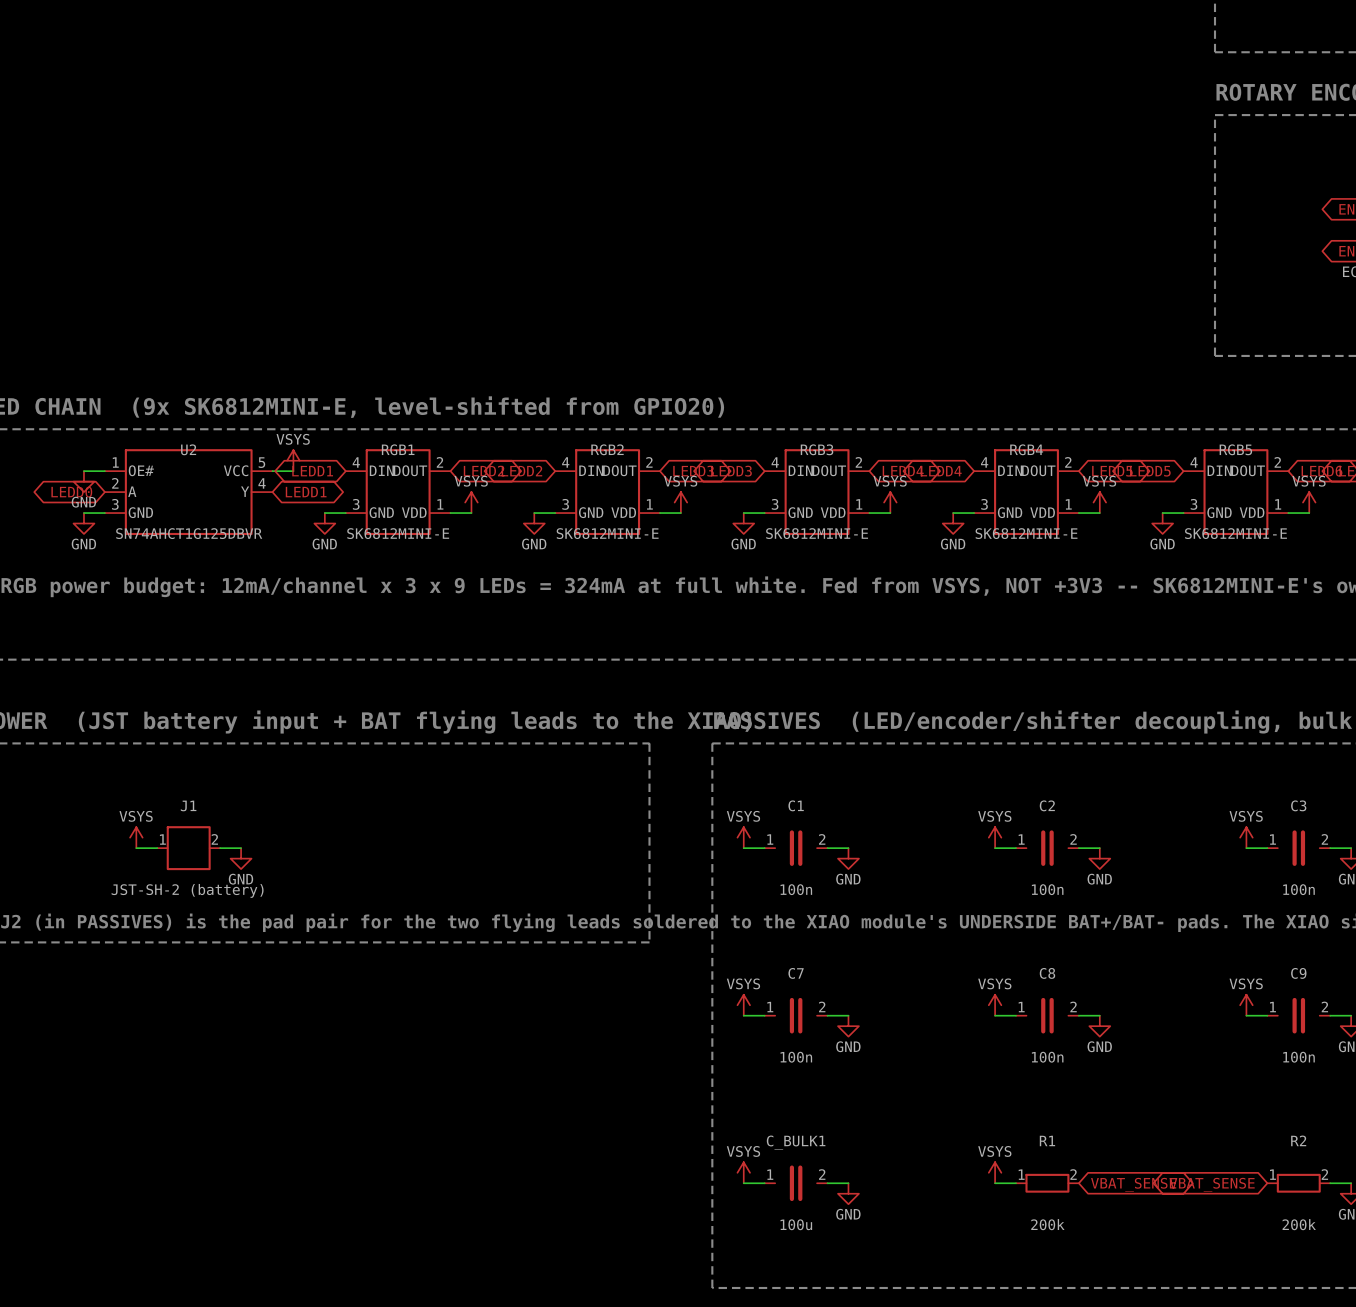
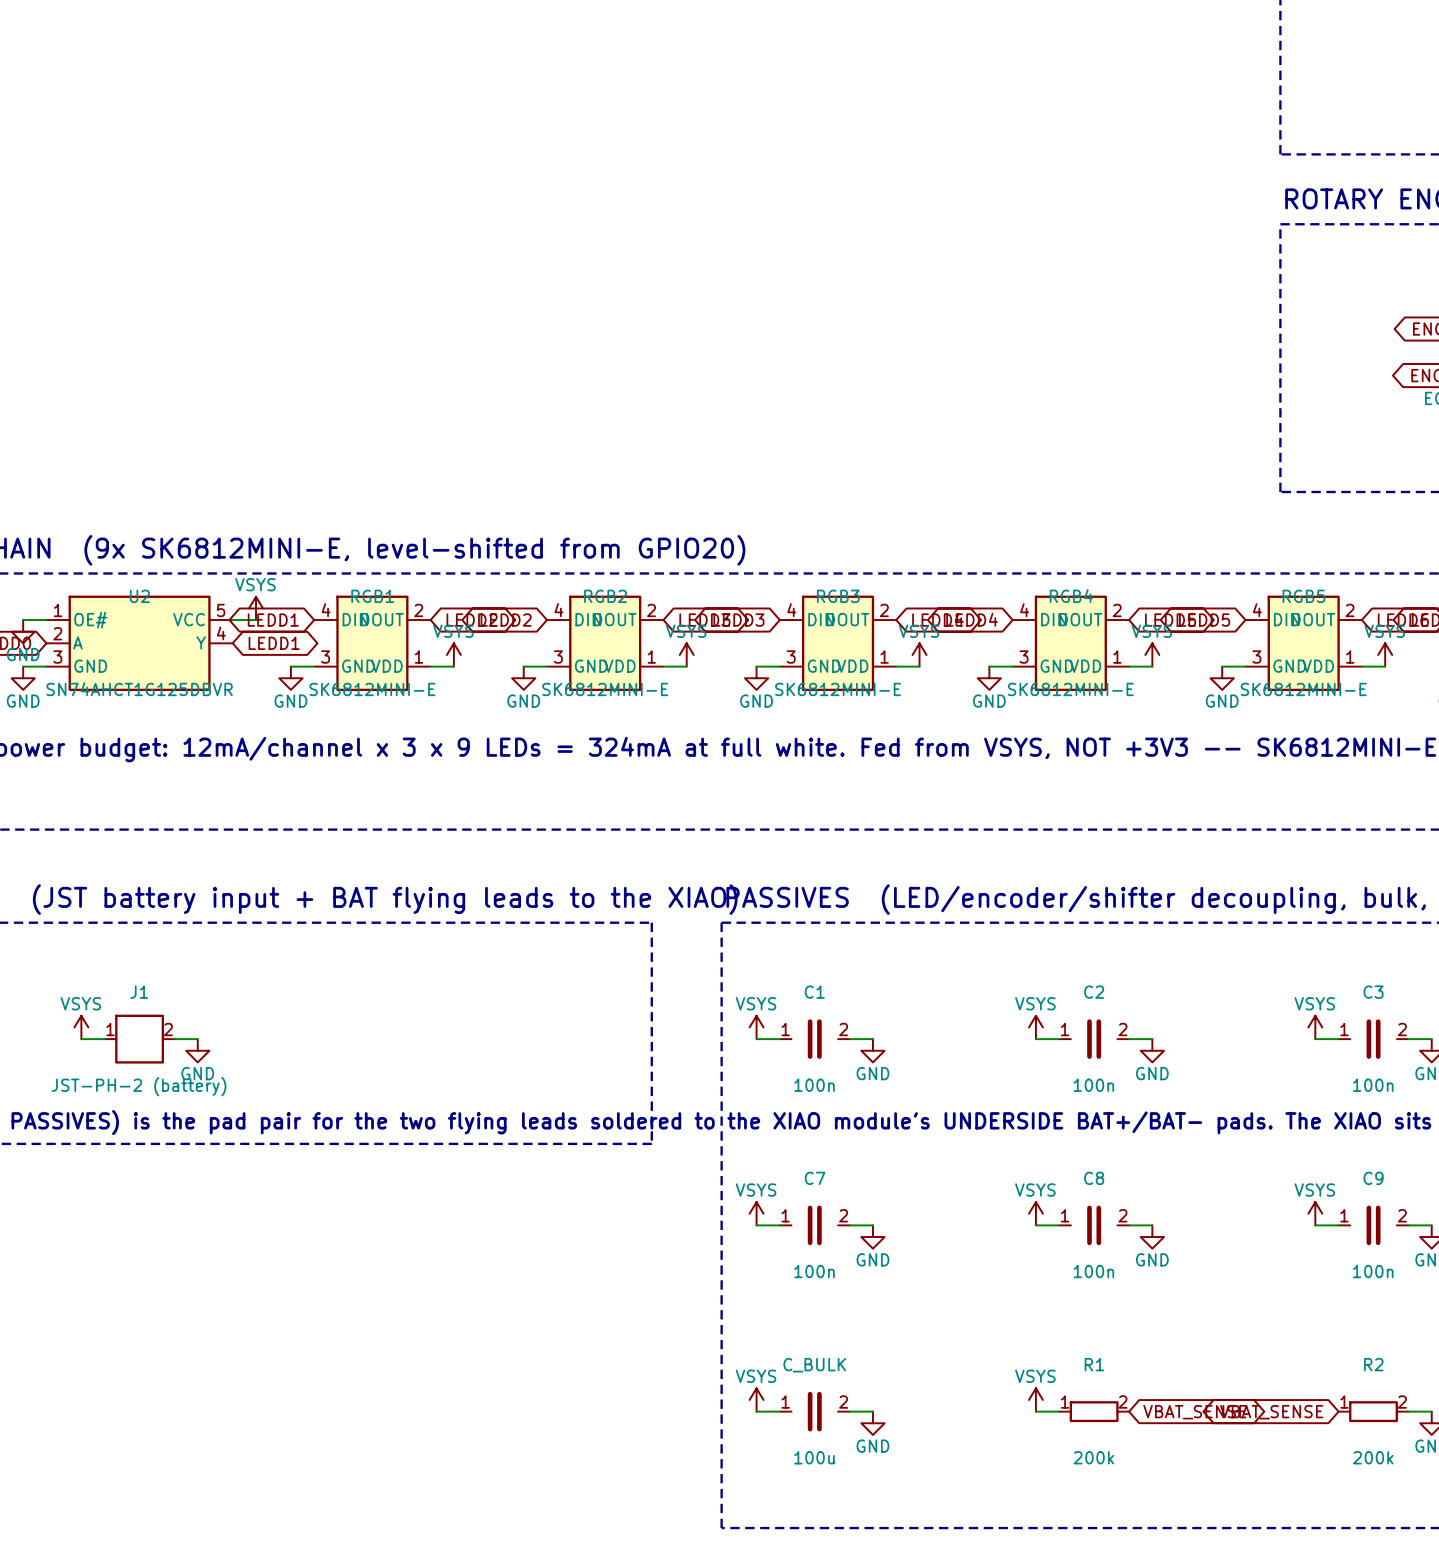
J1 value: JST-SH-2 (battery) (187, 890) -> JST-PH-2 (battery) (139, 1086)
C_BULK1 name: C_BULK1 (796, 1142) -> C_BULK (814, 1365)

